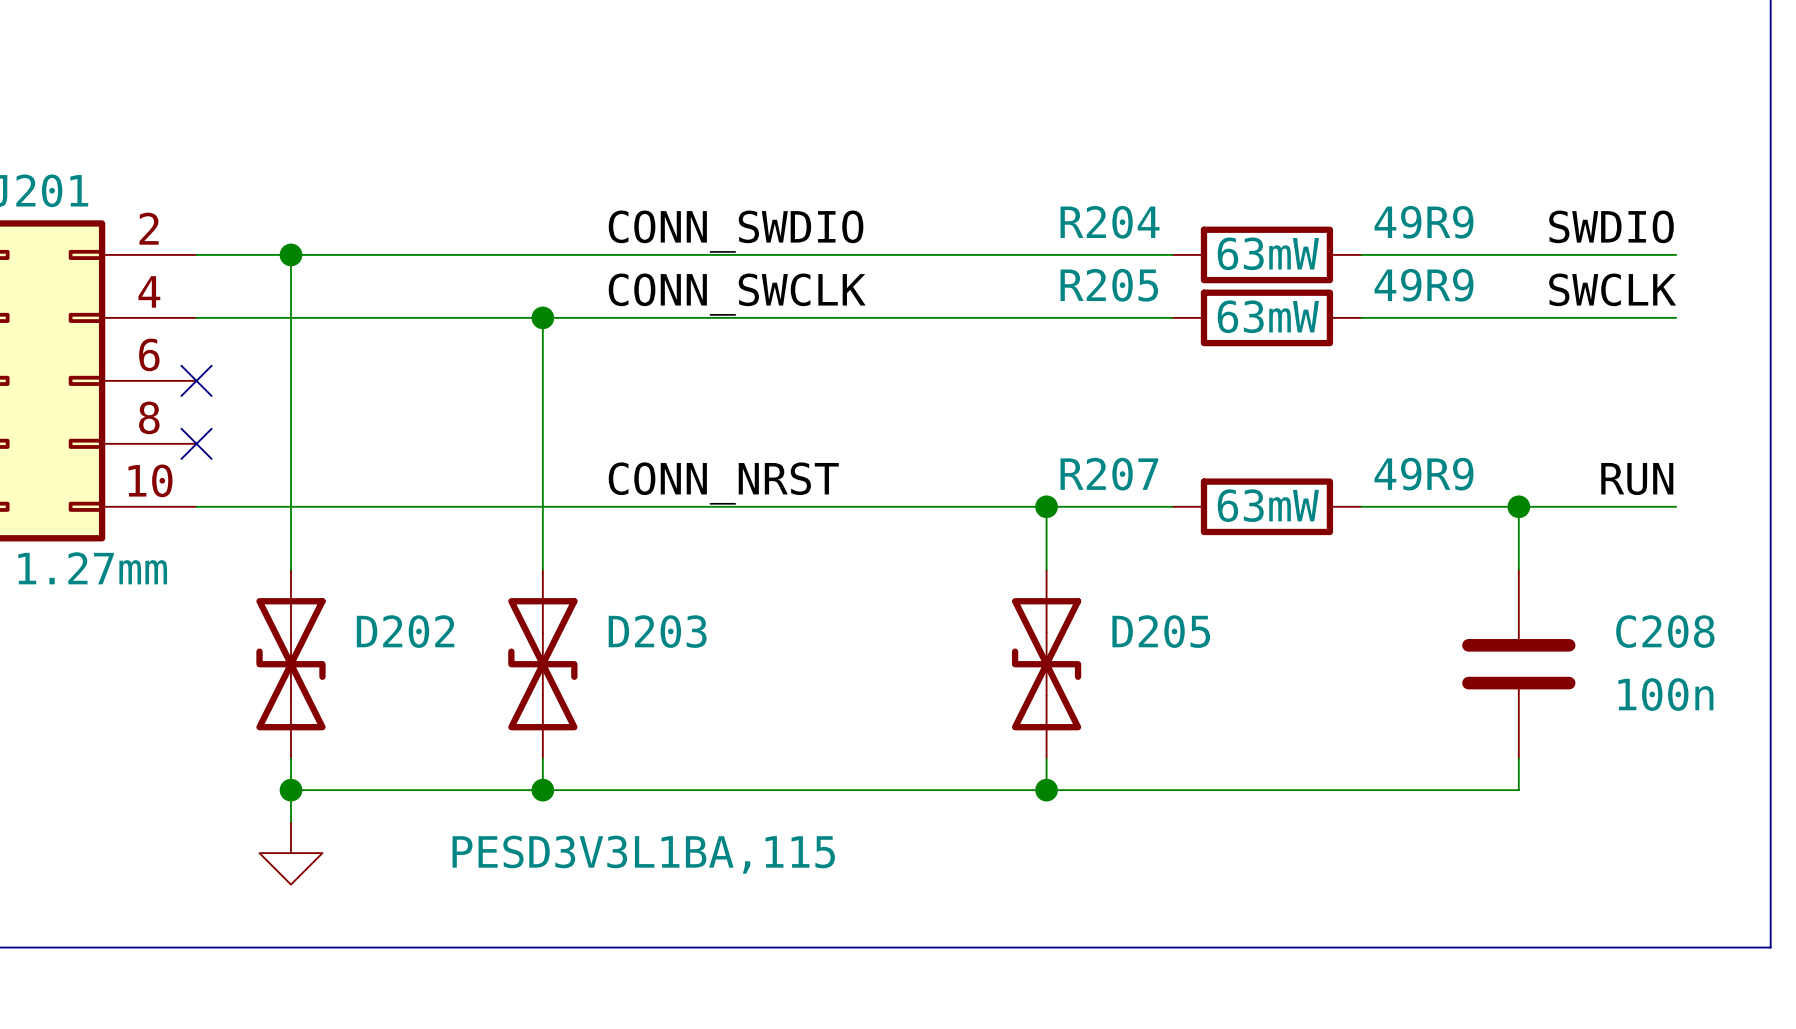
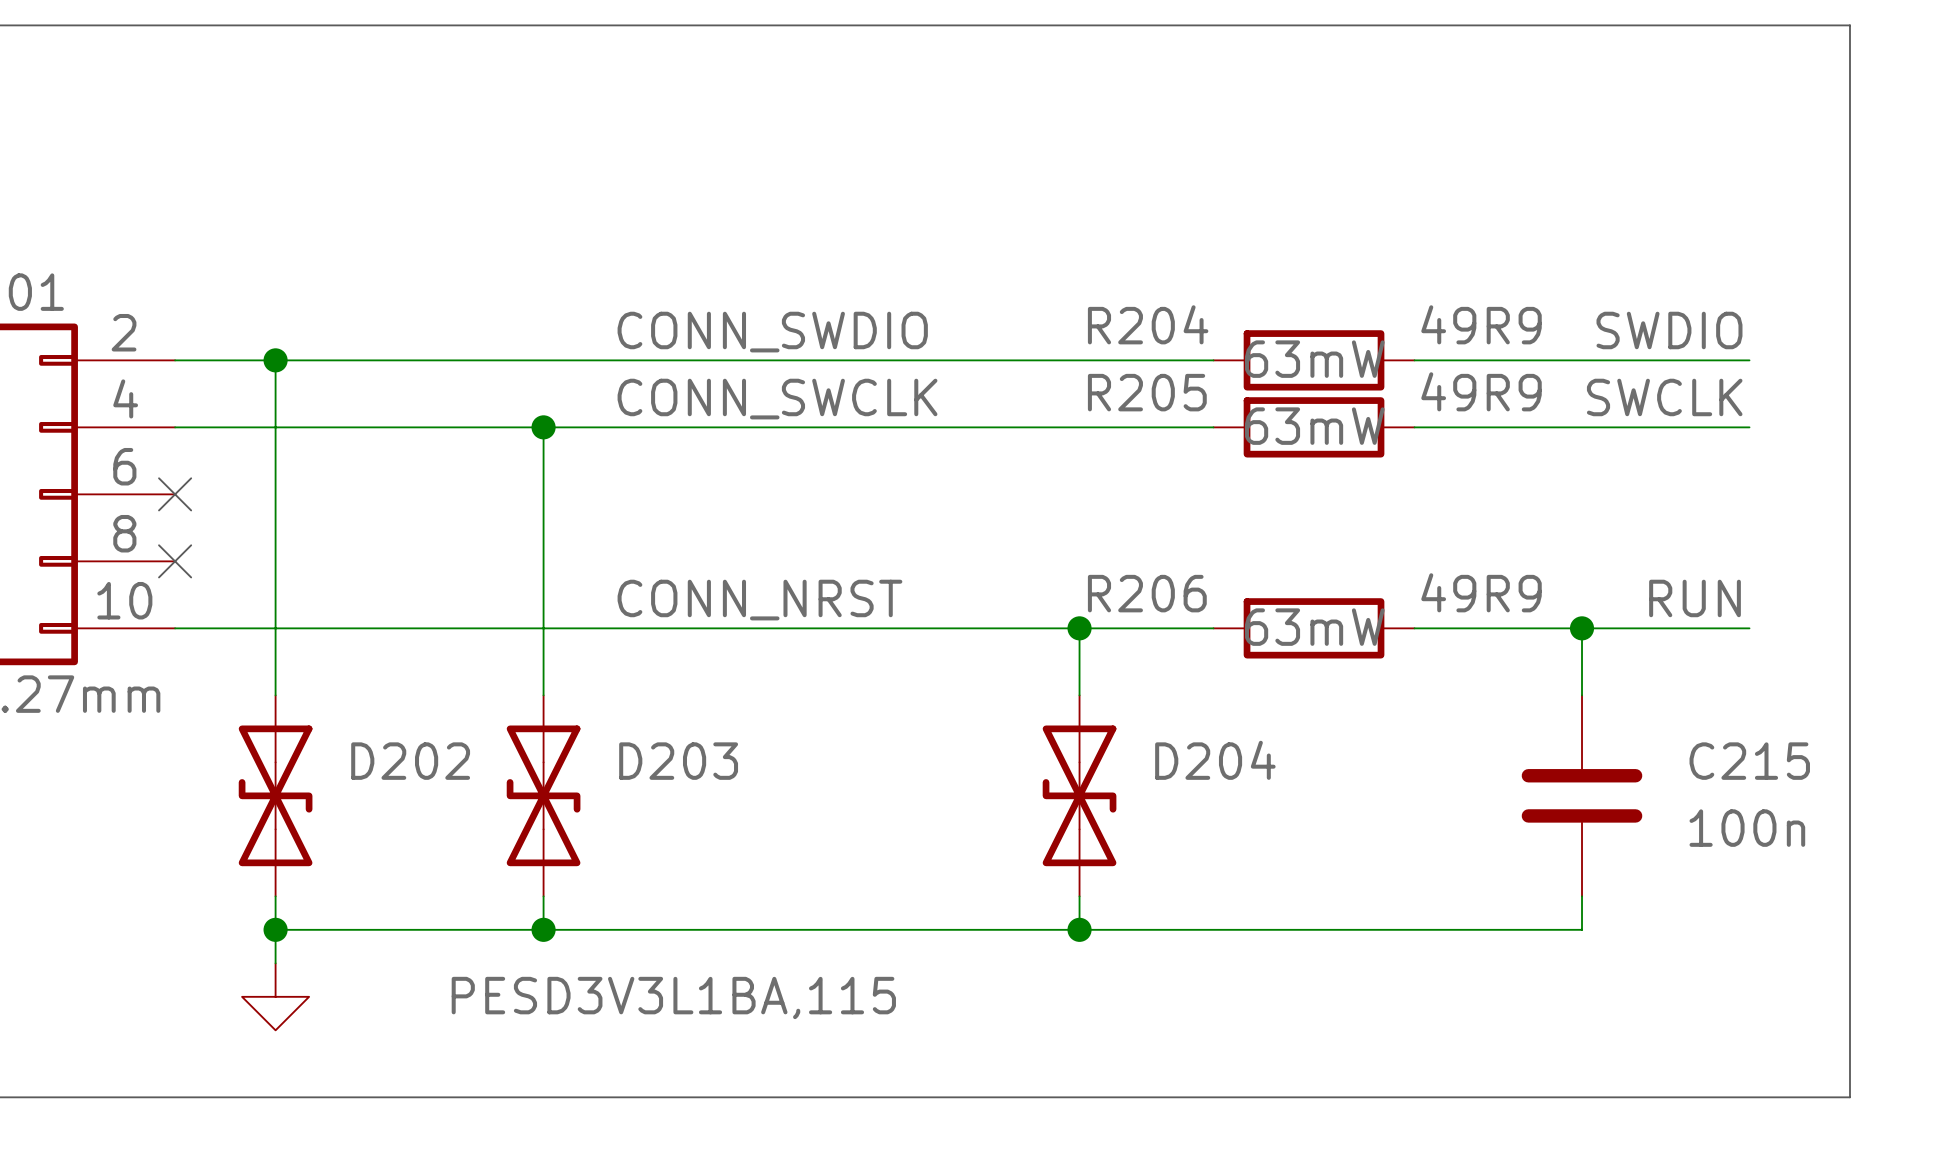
R207 name: R207 (1109, 474) -> R206 (1147, 593)
D205 name: D205 (1161, 631) -> D204 (1215, 760)
C208 name: C208 (1665, 631) -> C215 (1749, 761)

